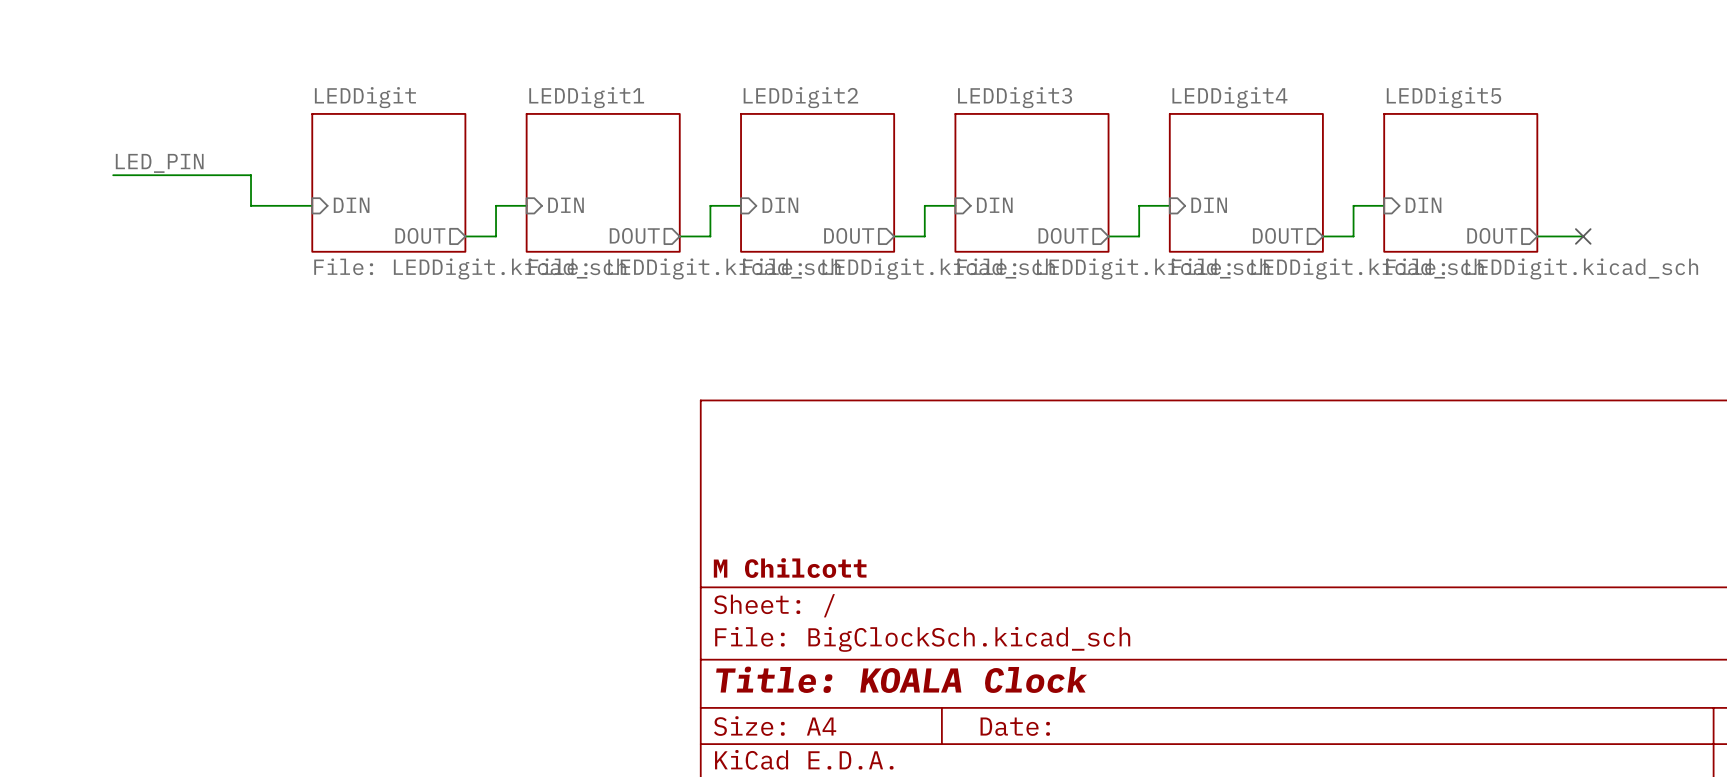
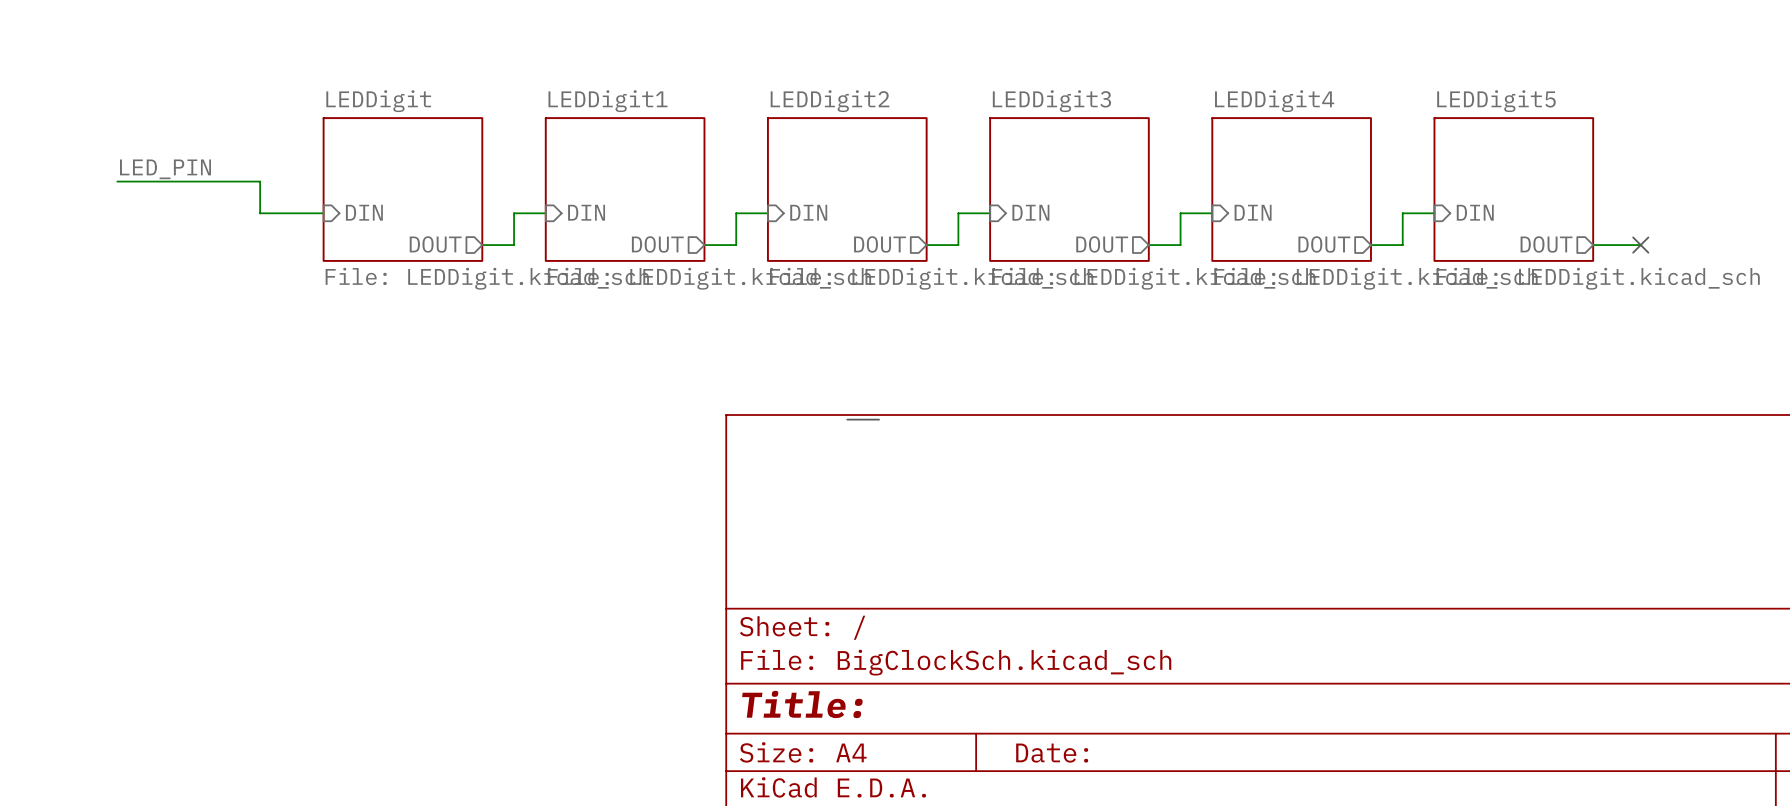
line: none -> (847, 419) (879, 419)
title block: M Chilcott (790, 568) -> none
title block: Title: KOALA Clock (901, 679) -> Title: (802, 704)

